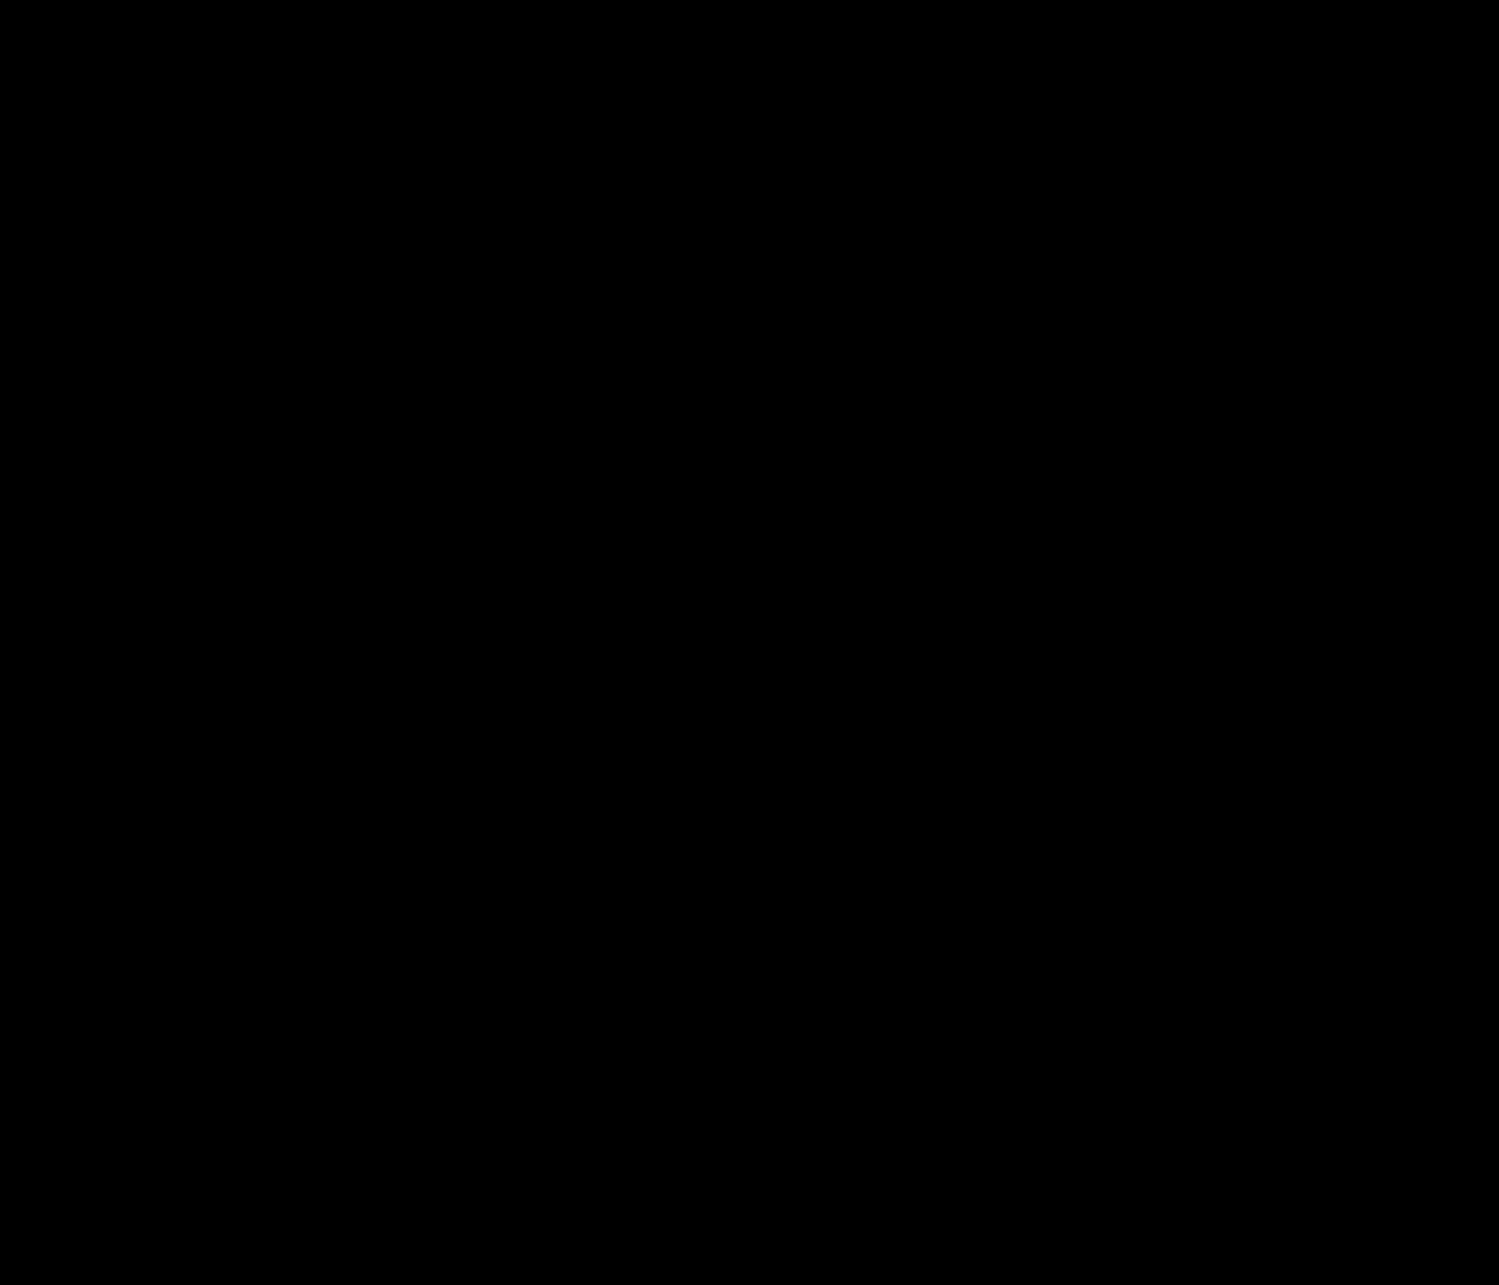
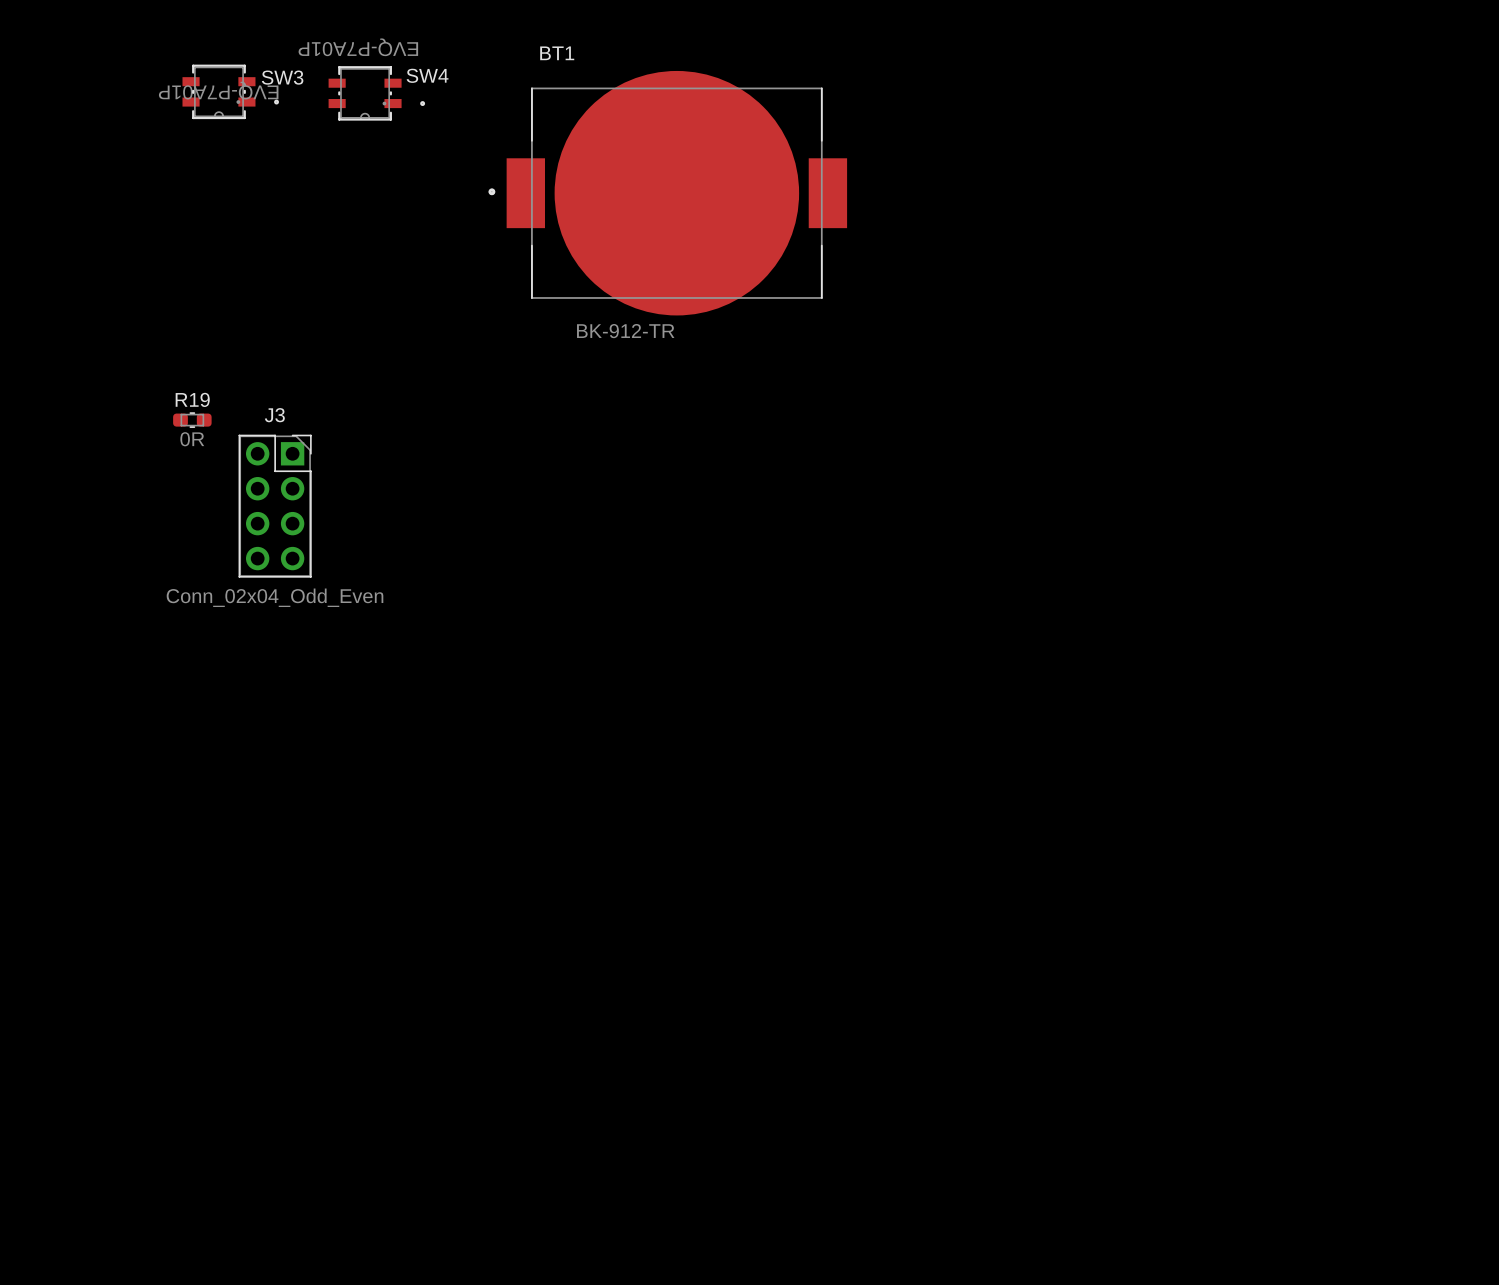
SW3: none -> EVQ-P7A01P (230, 91)
SW4: none -> EVQ-P7A01P (376, 93)
BT1: none -> BK-912-TR (667, 193)
R19: none -> 0R (192, 420)
J3: none -> Conn_02x04_Odd_Even (275, 506)

